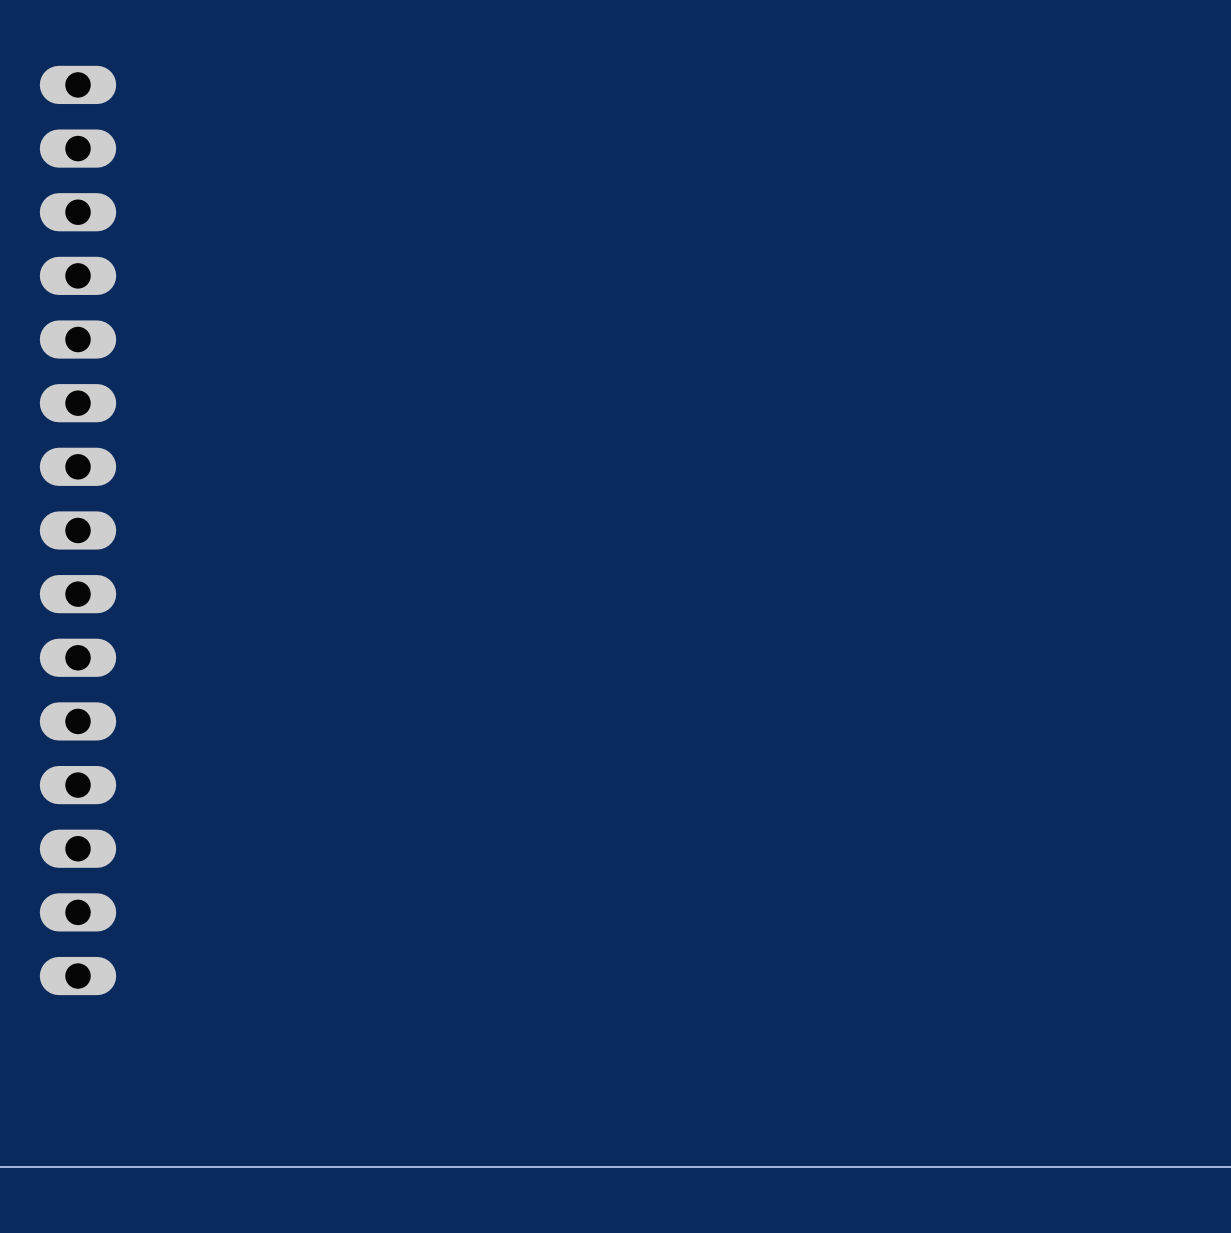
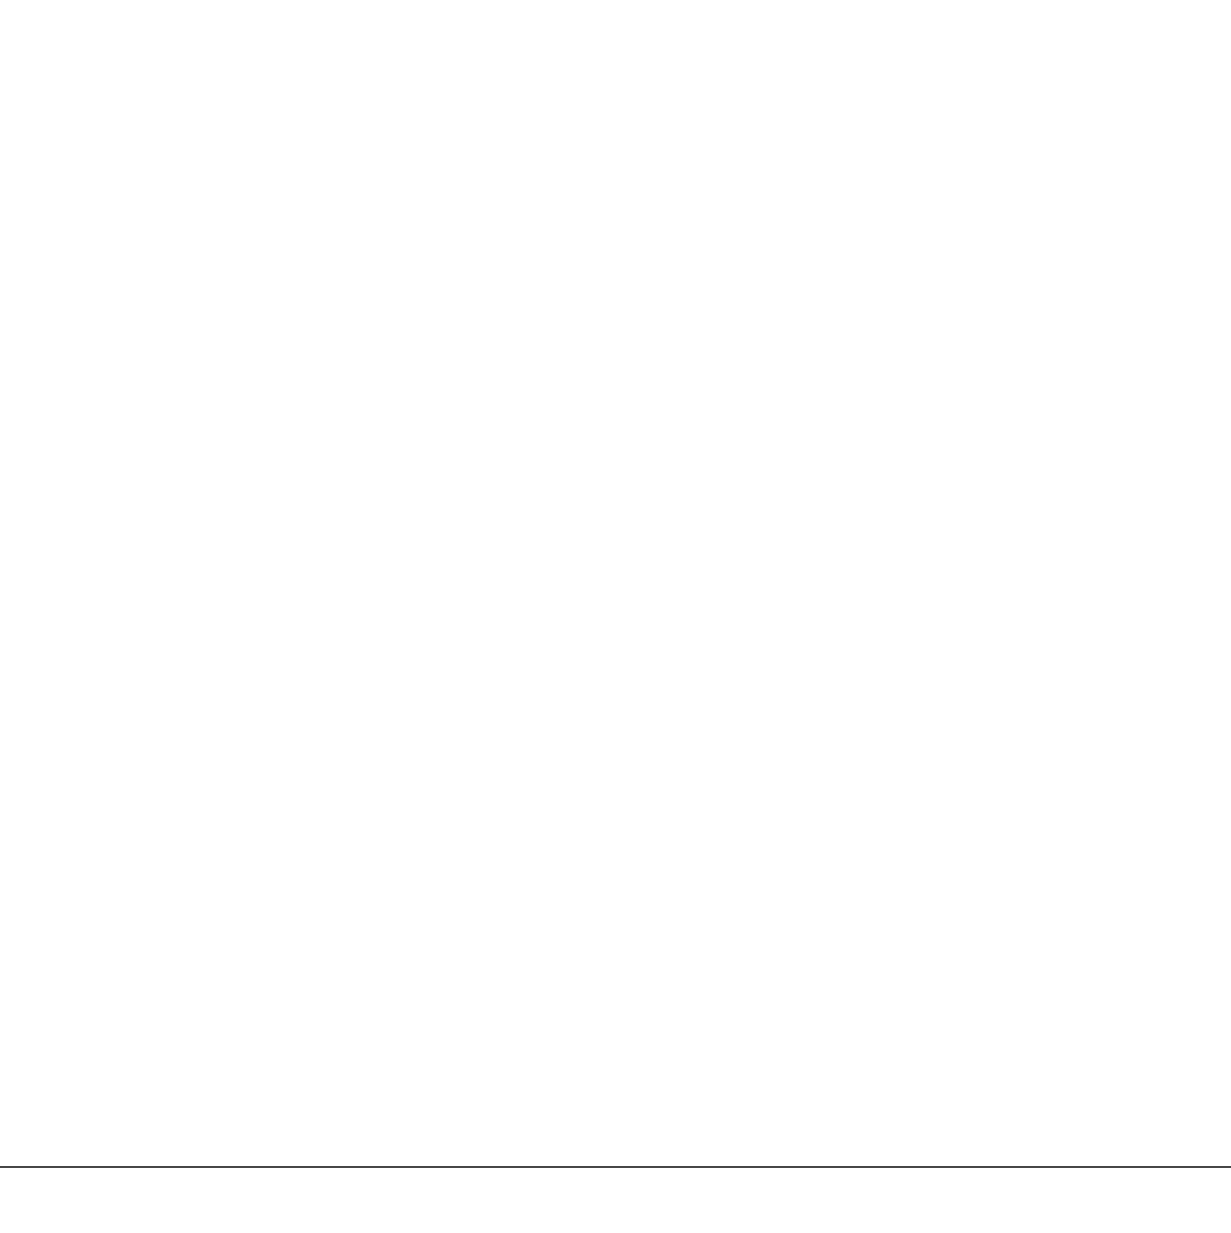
part: (78, 530) -> none

